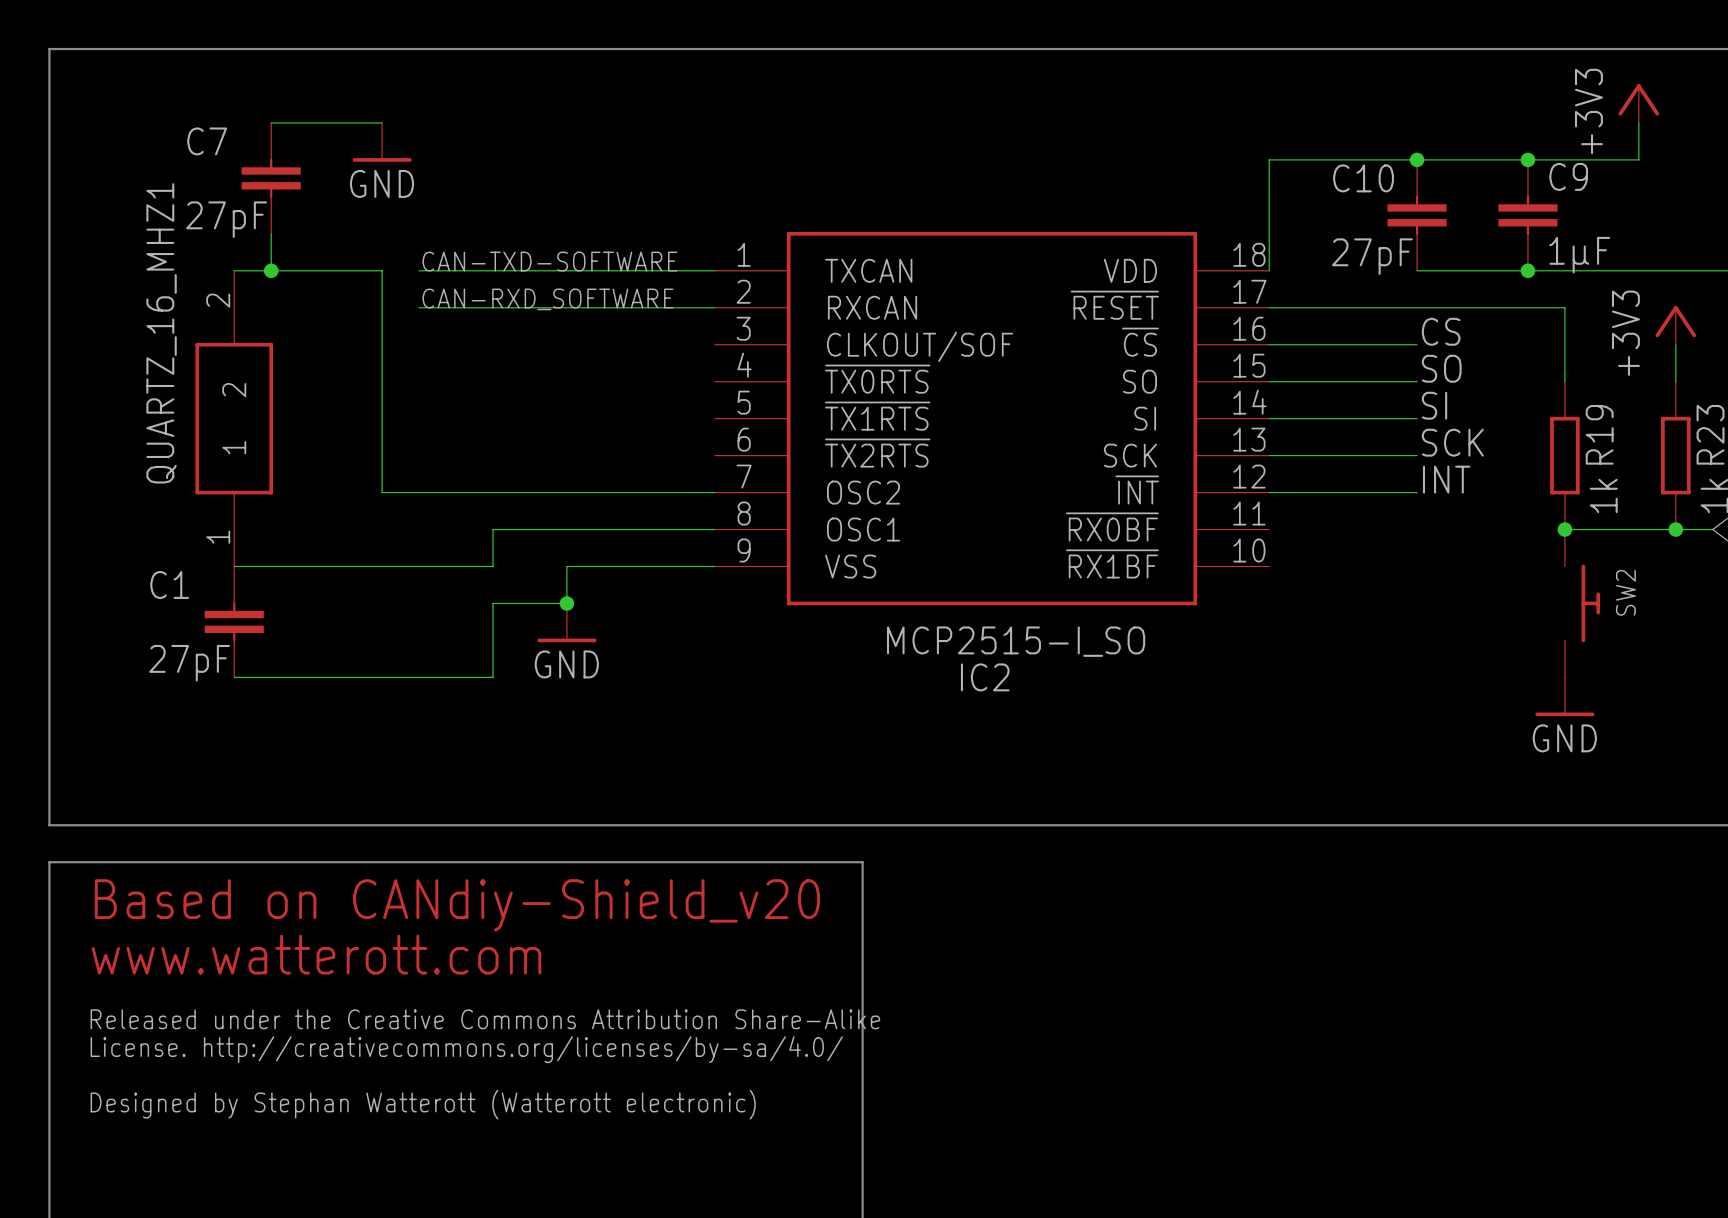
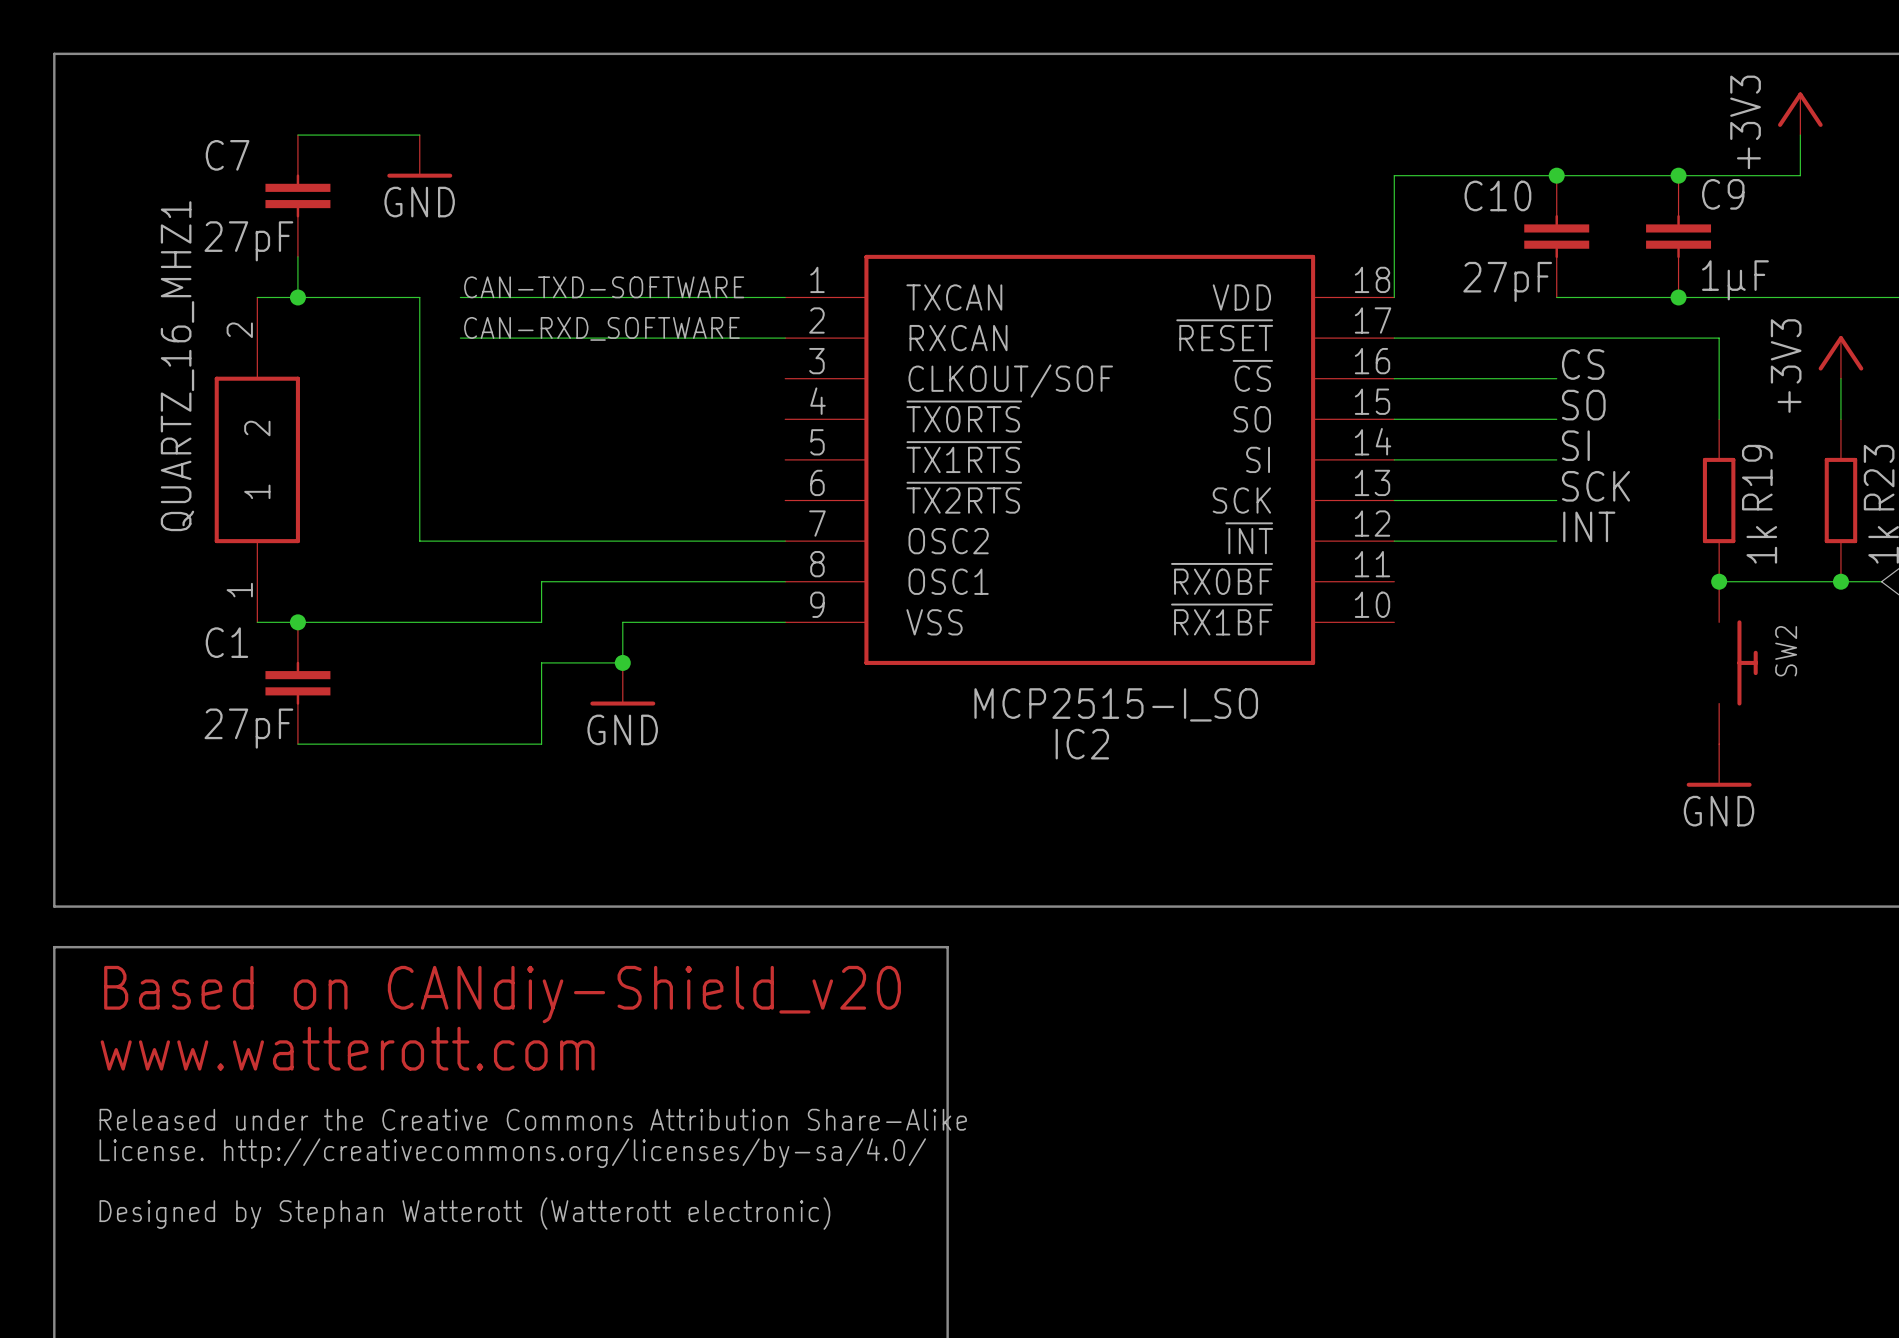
junction: none -> (297, 622)
C1 position: (234, 621) -> (297, 683)
wire: (234, 677) (271, 677) -> none

